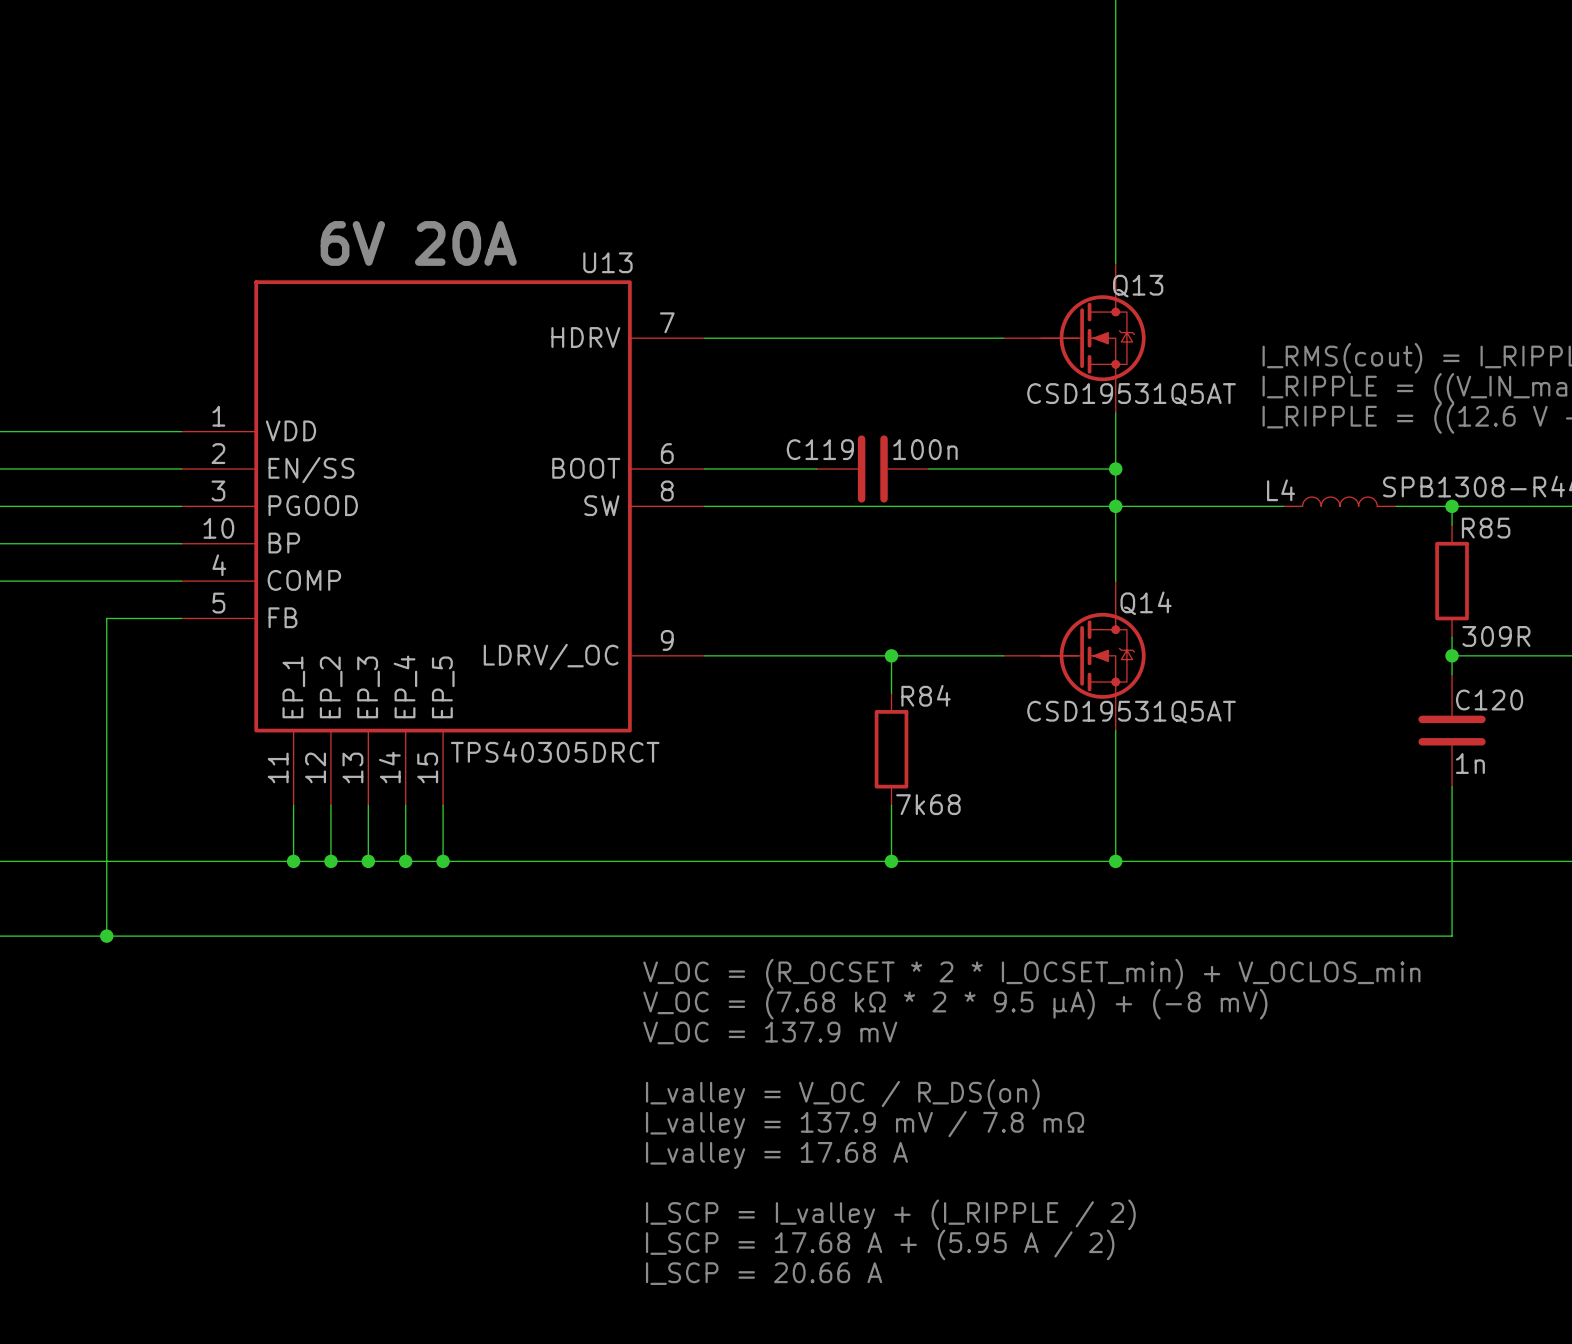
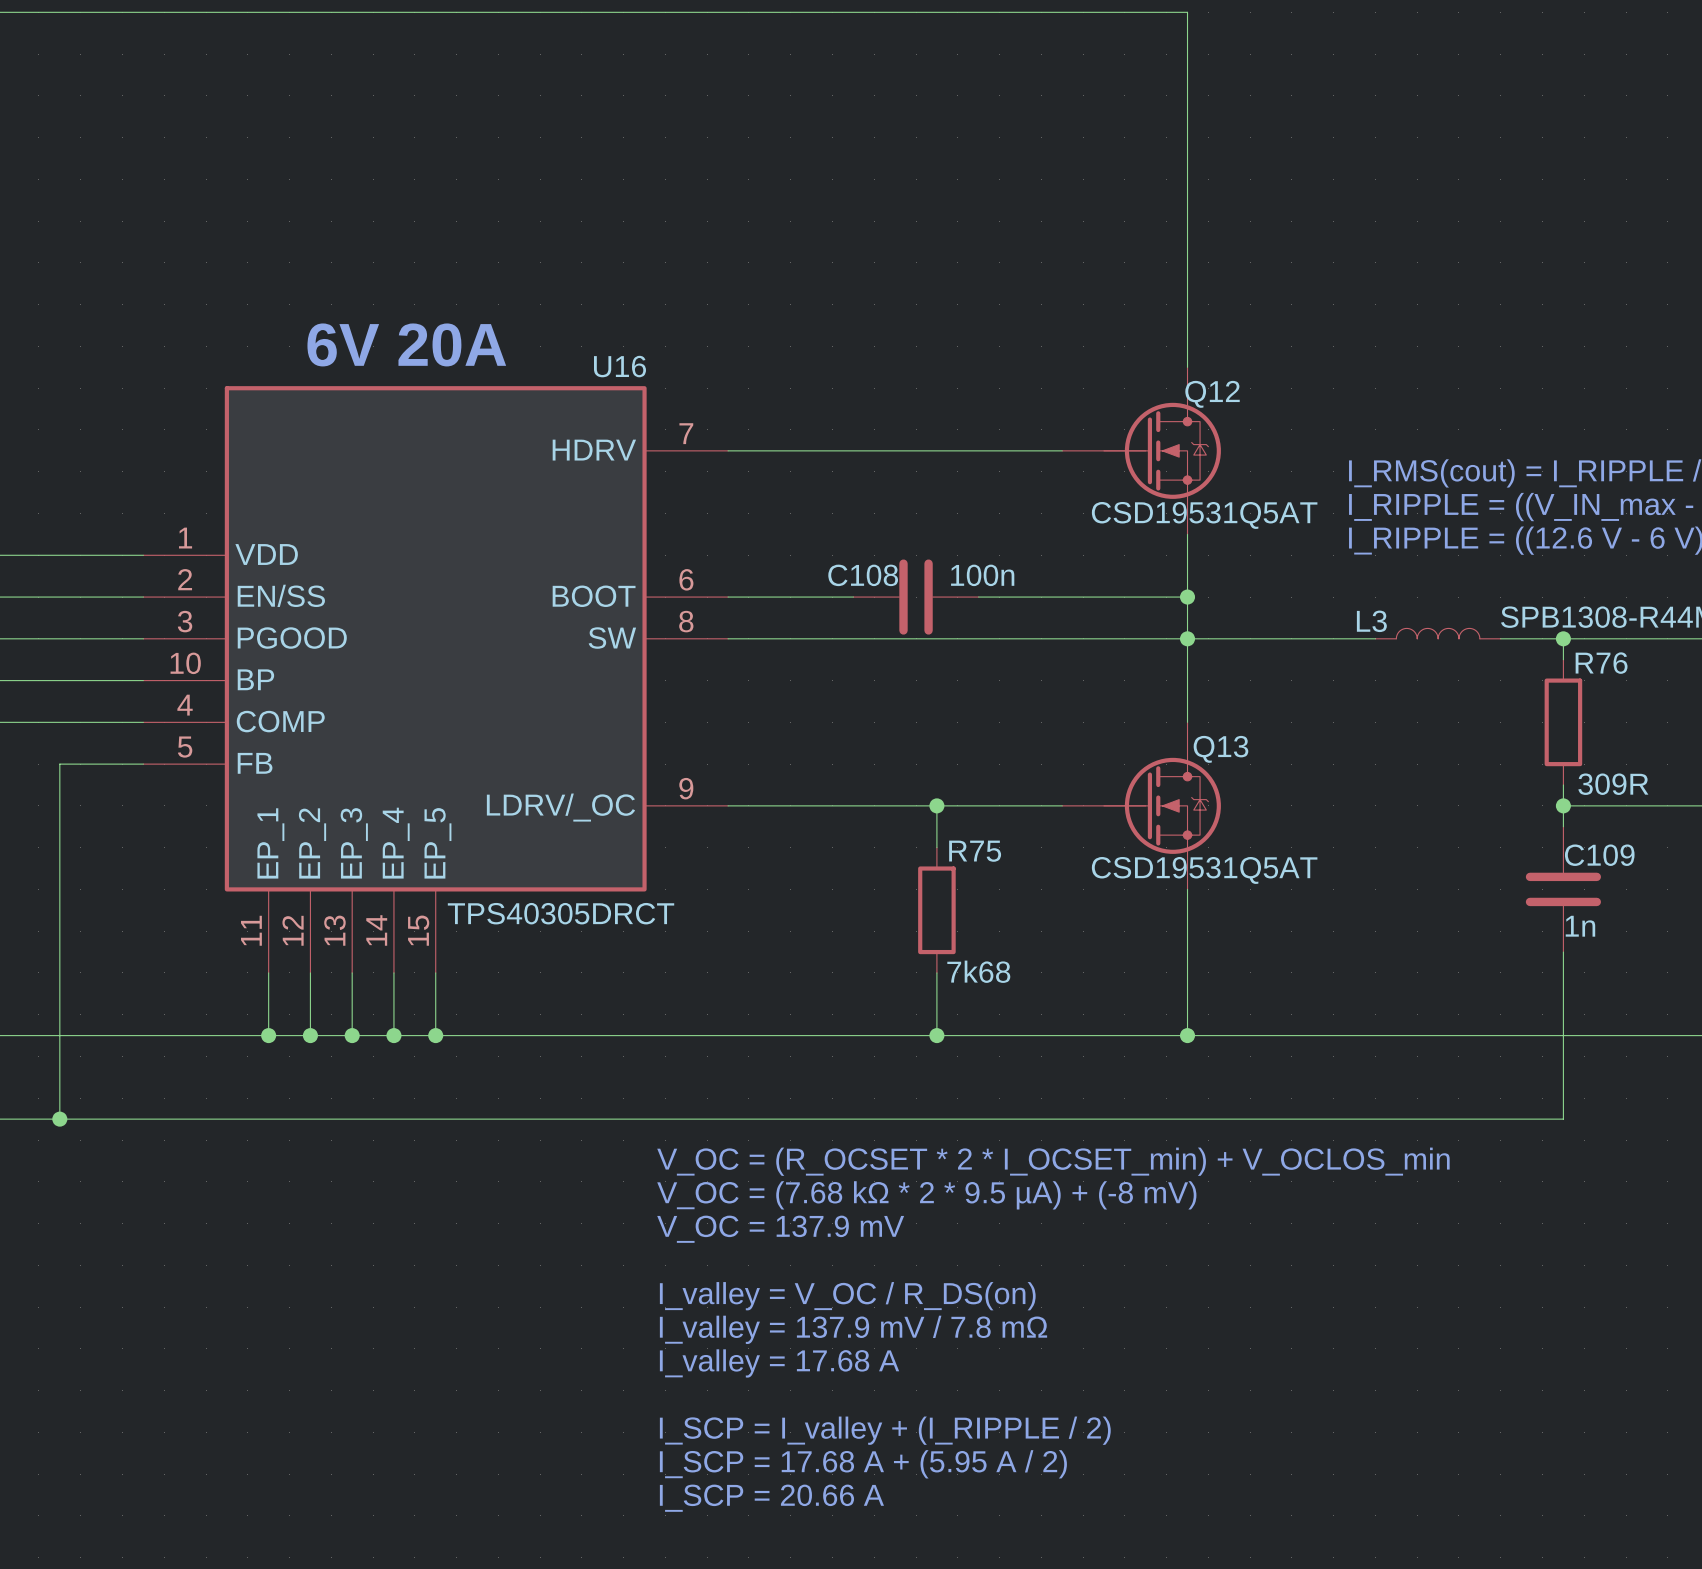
U13 name: U13 (607, 262) -> U16 (620, 366)
Q13 name: Q13 (1138, 286) -> Q12 (1212, 394)
C119 name: C119 (820, 449) -> C108 (863, 575)
L4 name: L4 (1281, 490) -> L3 (1371, 621)
R85 name: R85 (1486, 528) -> R76 (1601, 663)
Q14 name: Q14 (1146, 603) -> Q13 (1220, 749)
R84 name: R84 (926, 695) -> R75 (975, 851)
C120 name: C120 (1489, 699) -> C109 (1599, 855)

